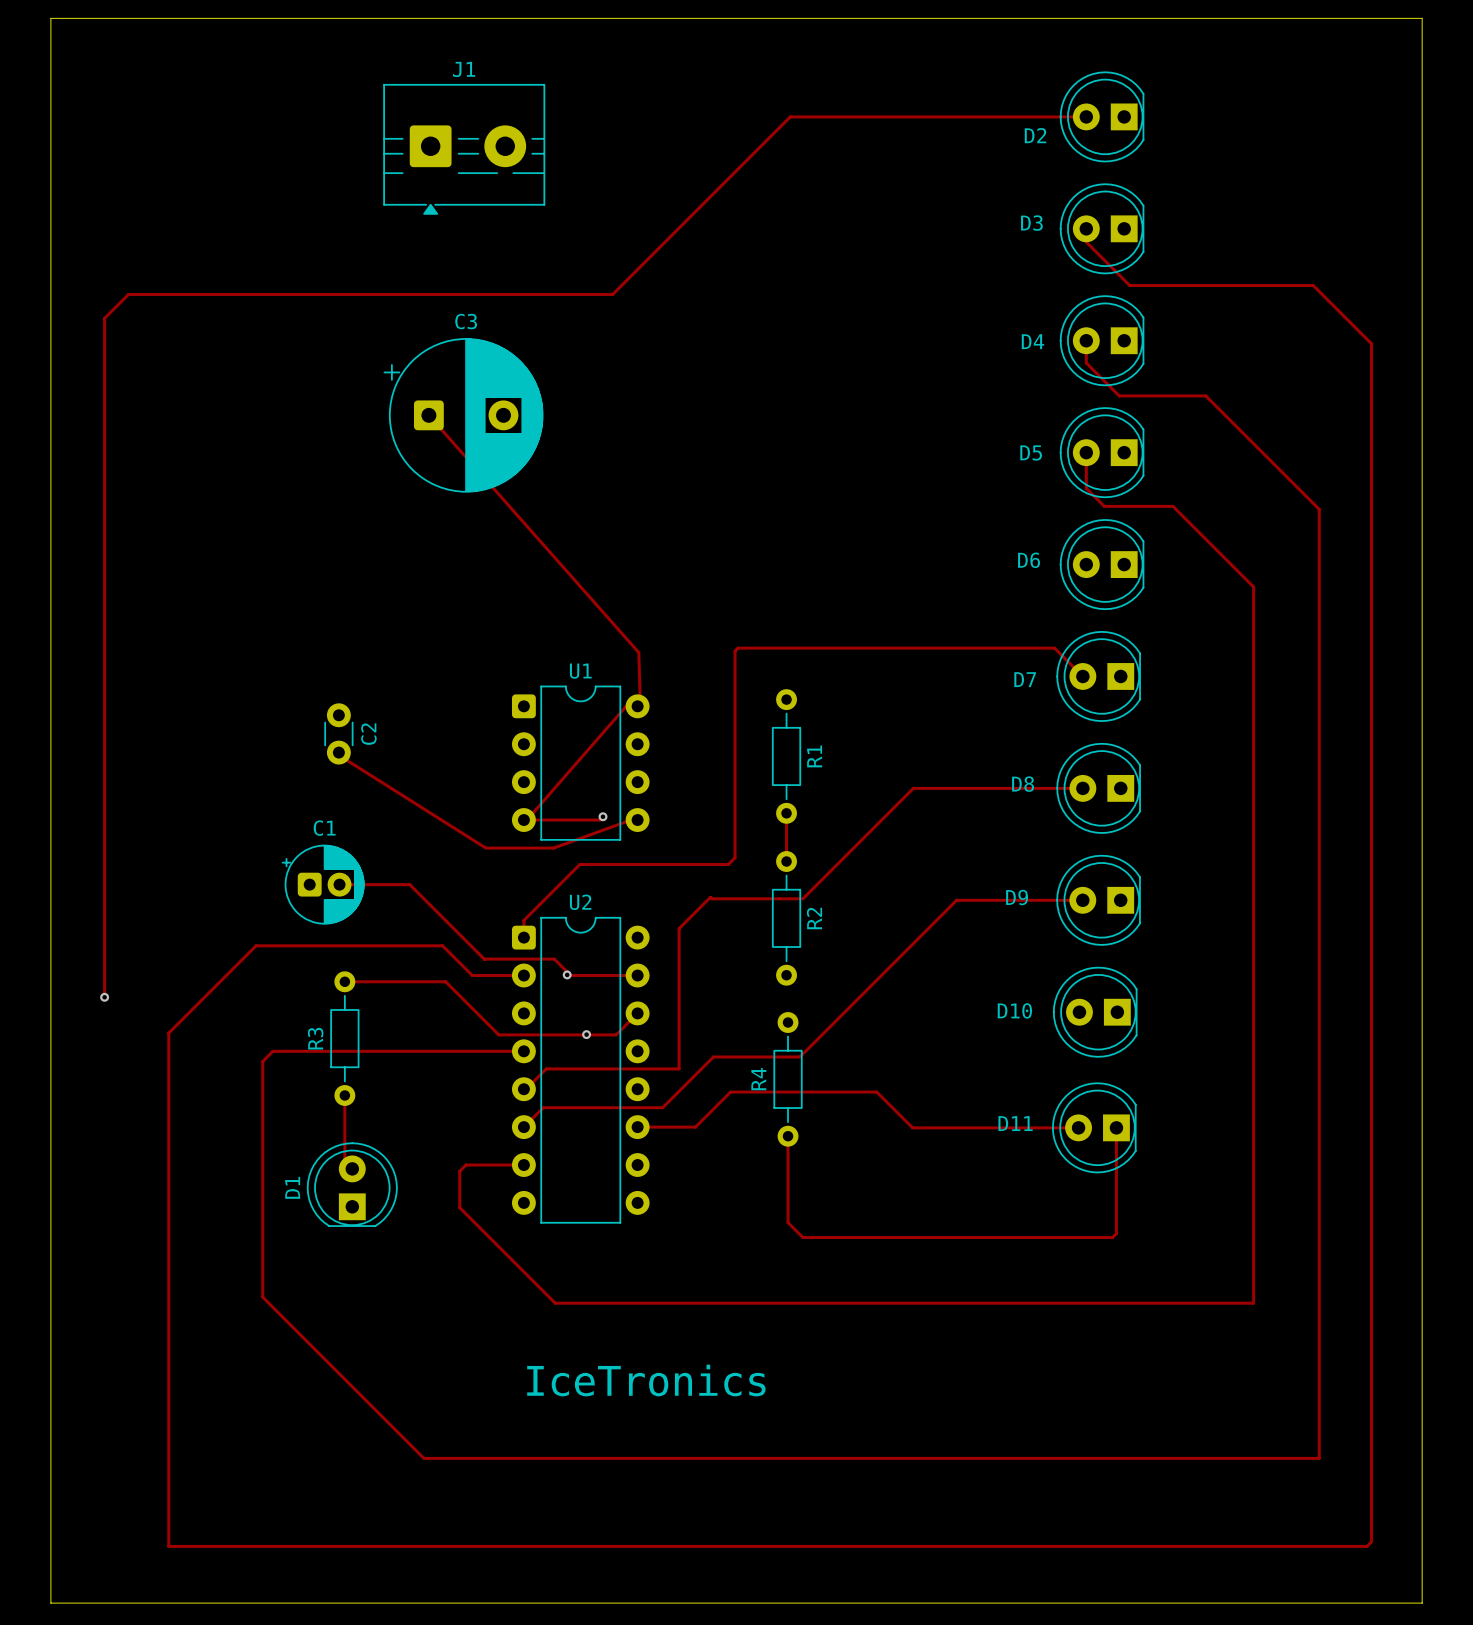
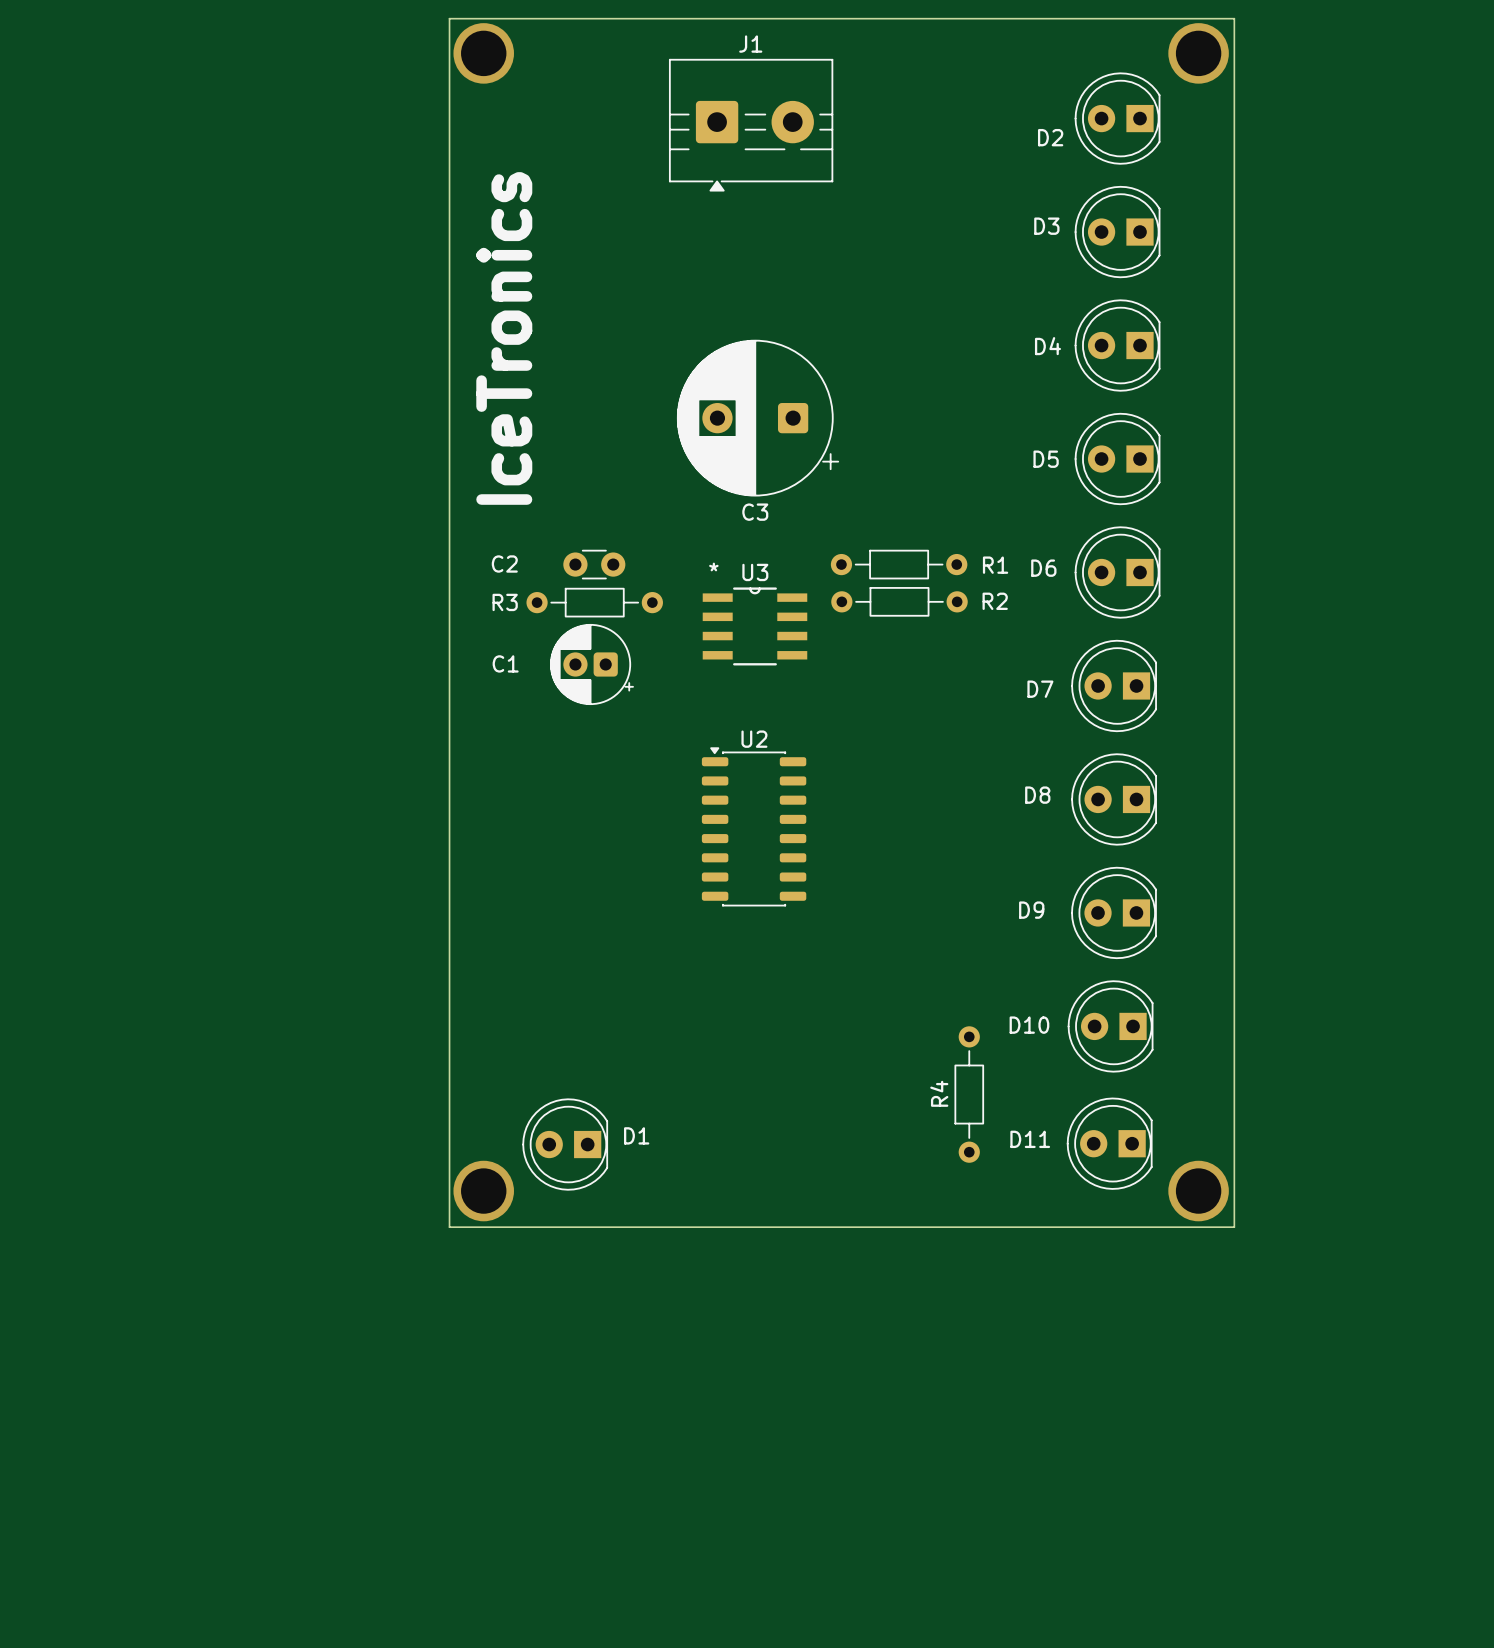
board edge: (443, 18) (50, 18) (50, 1603) (1422, 1603) (1422, 18) (1217, 18) -> (449, 18) (449, 1227) (1234, 1227) (1234, 18)
via: none -> (483, 53)
via: none -> (1198, 53)
track: (1089, 116) (790, 116) (612, 294) (128, 294) (104, 318) (104, 997) -> none
J1 position: (464, 149) -> (751, 125)
track: (1086, 228) (1086, 242) (1129, 285) (1313, 285) (1371, 343) (1371, 1541) (1366, 1546) (168, 1546) (168, 1033) (256, 945) (442, 945) (472, 975) (523, 975) -> none
text: none -> IceTronics (504, 338)
track: (1086, 340) (1086, 362) (1119, 395) (1205, 395) (1319, 509) (1319, 1458) (423, 1458) (262, 1297) (262, 1061) (272, 1051) (523, 1051) -> none
track: (428, 415) (638, 652) (640, 701) -> none
C3 rotation: 0° (463, 415) -> 180° (758, 418)
C3 position: (463, 415) -> (758, 418)
track: (1086, 452) (1086, 488) (1104, 506) (1173, 506) (1253, 586) (1253, 1303) (555, 1303) (459, 1207) (459, 1171) (466, 1165) (523, 1165) -> none
U3: none -> (754, 626)
track: (1082, 676) (1054, 648) (738, 648) (735, 651) (735, 857) (728, 864) (579, 864) (523, 920) (523, 937) -> none
track: (628, 703) (529, 817) -> none
C2 rotation: 0° (338, 733) -> 90° clockwise (594, 564)
C2 position: (338, 733) -> (594, 564)
C2 name position: C2 (368, 734) -> C2 (504, 564)
R1 rotation: 0° (786, 756) -> 90° clockwise (899, 564)
R1 position: (786, 756) -> (899, 564)
R1 name position: R1 (814, 756) -> R1 (995, 565)
track: (344, 758) (485, 848) -> none
U1: (580, 763) -> none
track: (1082, 788) (913, 788) (802, 898) (710, 897) (679, 928) (679, 1068) (546, 1068) (523, 1089) -> none
track: (786, 813) (786, 861) -> none
track: (603, 816) (599, 820) (523, 820) -> none
via: (603, 816) -> none
track: (635, 818) (553, 848) (486, 848) -> none
C1 name position: C1 (324, 828) -> C1 (505, 663)
C1 rotation: 0° (323, 884) -> 180° (591, 664)
C1 position: (323, 884) -> (591, 664)
track: (339, 884) (409, 884) (484, 959) -> none
track: (1082, 900) (956, 900) (799, 1056) (713, 1056) (662, 1107) (543, 1107) (523, 1127) -> none
U2 name position: U2 (580, 902) -> U2 (754, 739)
U2 footprint: [511, 916, 650, 1224] -> [701, 747, 807, 907]
R2 rotation: 0° (786, 918) -> 90° clockwise (899, 601)
R2 position: (786, 918) -> (899, 601)
R2 name position: R2 (814, 918) -> R2 (995, 601)
track: (484, 959) (554, 959) (567, 971) (567, 974) -> none
track: (565, 973) (567, 975) (637, 975) -> none
via: (567, 974) -> none
track: (344, 981) (444, 981) -> none
track: (445, 981) (498, 1034) (616, 1034) (637, 1013) -> none
via: (104, 997) -> none
via: (586, 1034) -> none
R3 name position: R3 (315, 1038) -> R3 (505, 602)
R3 rotation: 0° (344, 1038) -> 90° clockwise (594, 602)
R3 position: (344, 1038) -> (594, 602)
R4 position: (788, 1079) -> (969, 1094)
track: (344, 1095) (344, 1161) (352, 1168) -> none
track: (638, 1127) (695, 1127) (730, 1092) (876, 1092) (912, 1127) (1078, 1127) -> none
track: (1116, 1127) (1116, 1233) (1112, 1237) (802, 1237) (788, 1222) (788, 1136) -> none
D1 footprint: [306, 1142, 398, 1227] -> [522, 1098, 609, 1191]
via: none -> (483, 1191)
via: none -> (1198, 1191)
D1 name position: D1 (292, 1187) -> D1 (636, 1135)
text: IceTronics (646, 1380) -> none

